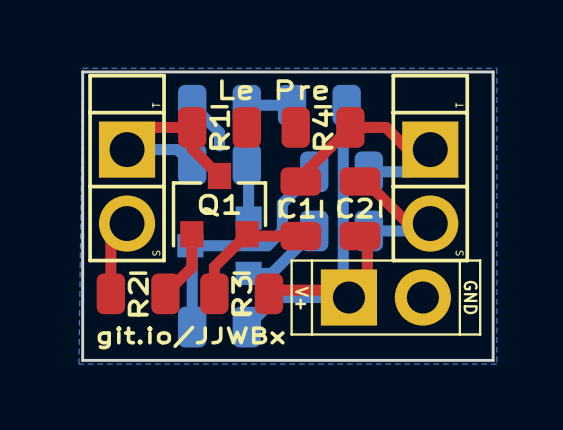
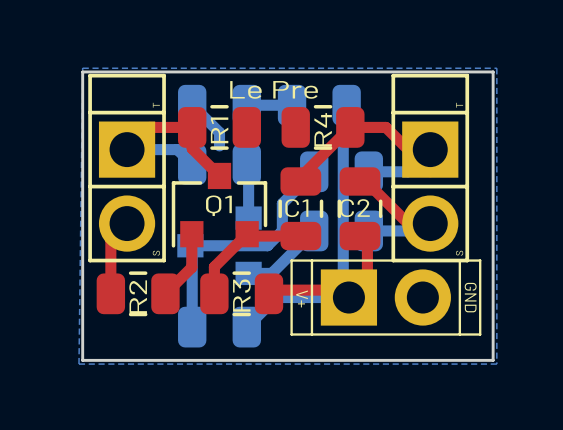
text: git.io/JJWBx (191, 337) -> none

